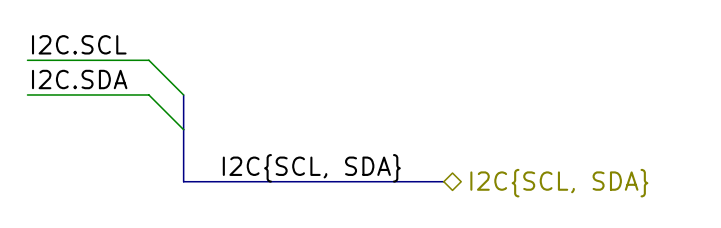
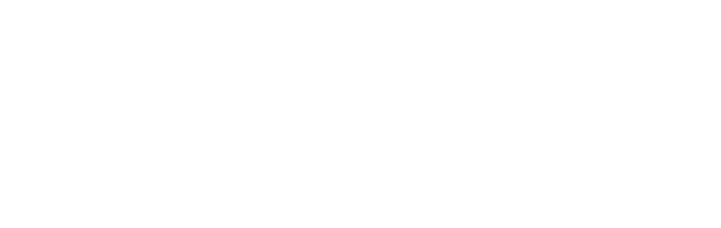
label: I2C.SCL (79, 44) -> none
wire: (27, 60) (148, 60) (183, 94) -> none
label: I2C.SDA (79, 79) -> none
wire: (27, 94) (148, 94) (183, 129) -> none
bus: (183, 94) (183, 181) (443, 181) -> none
label: I2C{SCL, SDA} (311, 168) -> none
hierarchical label: I2C{SCL, SDA} (559, 183) -> none

